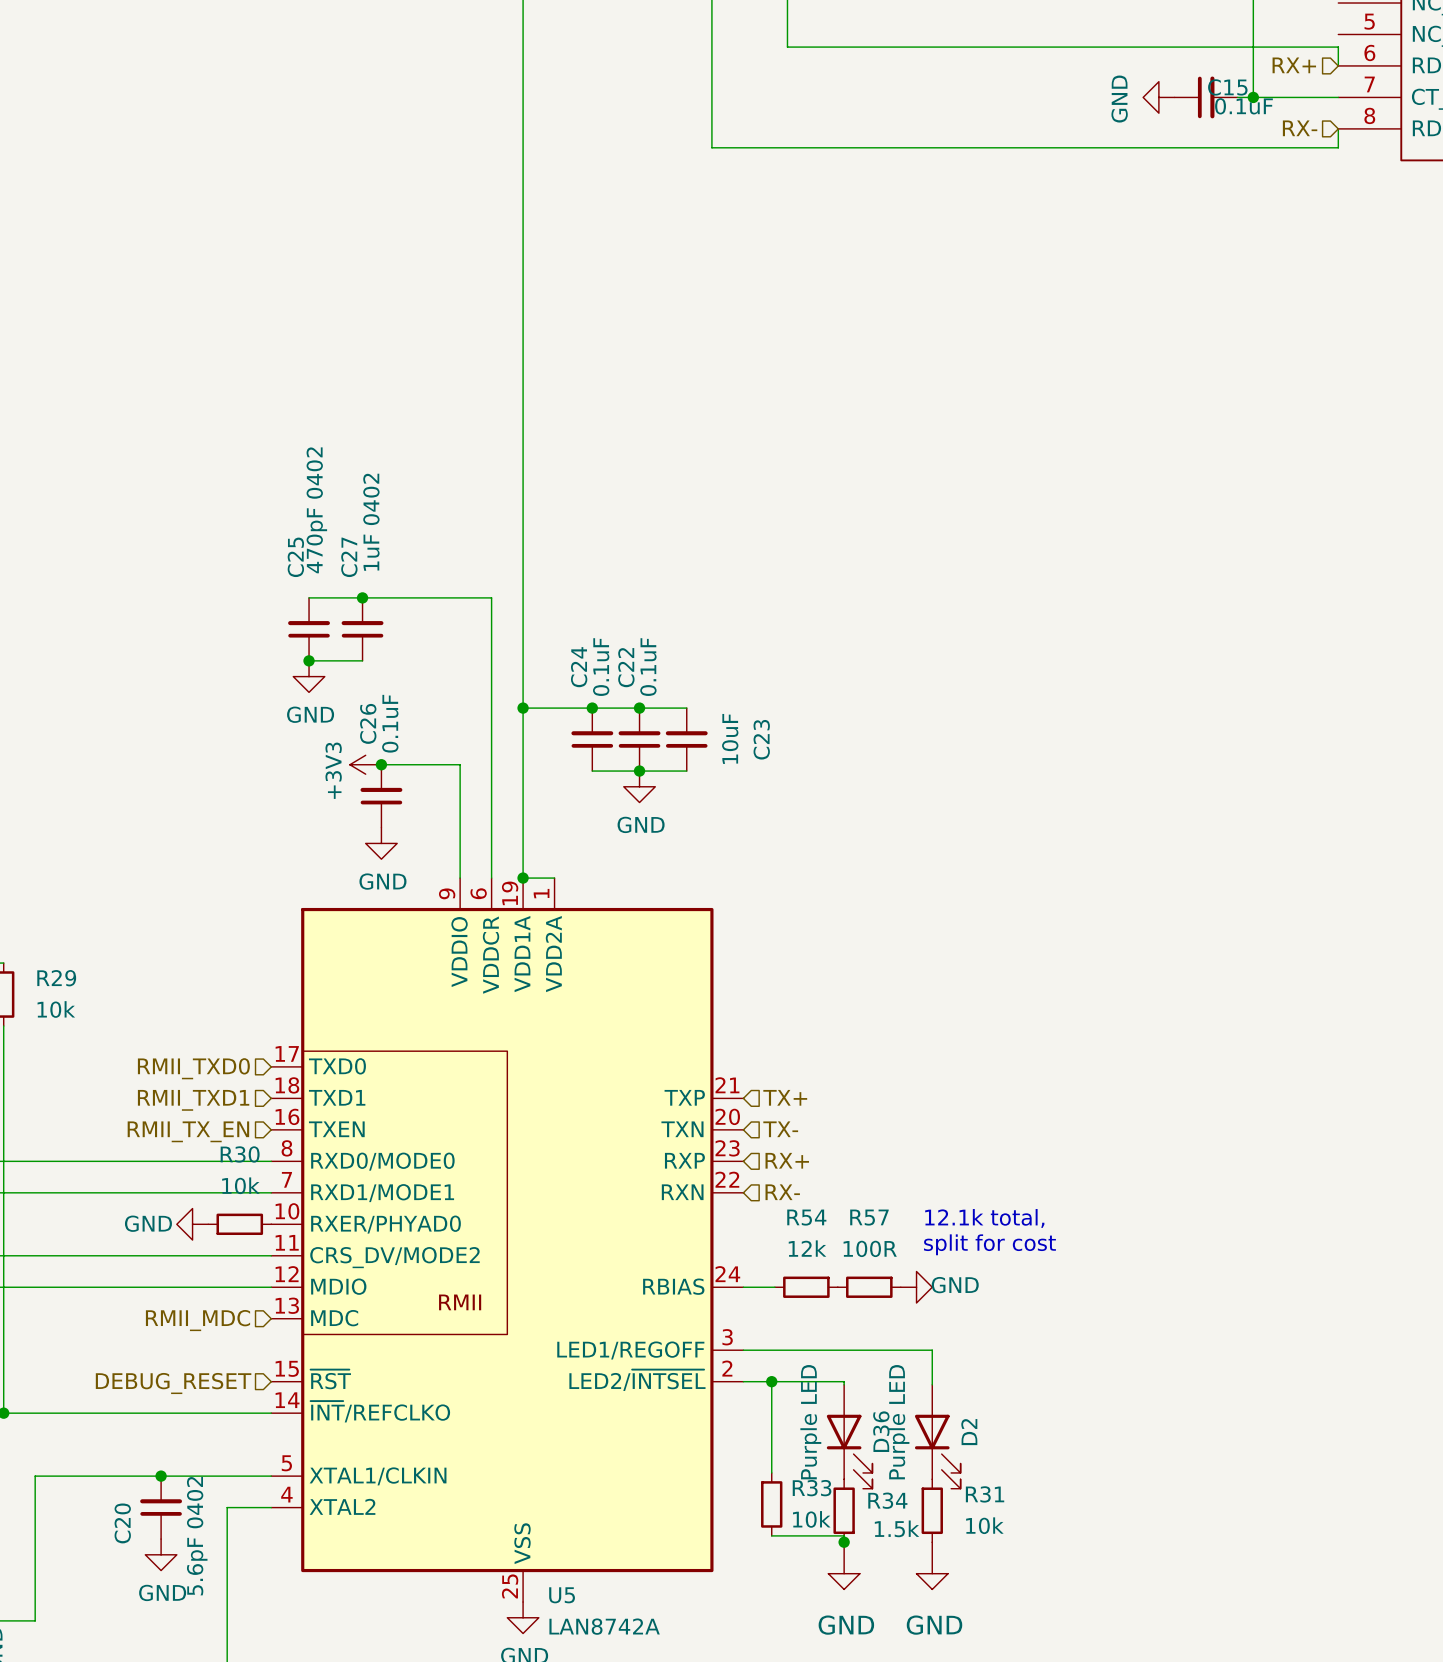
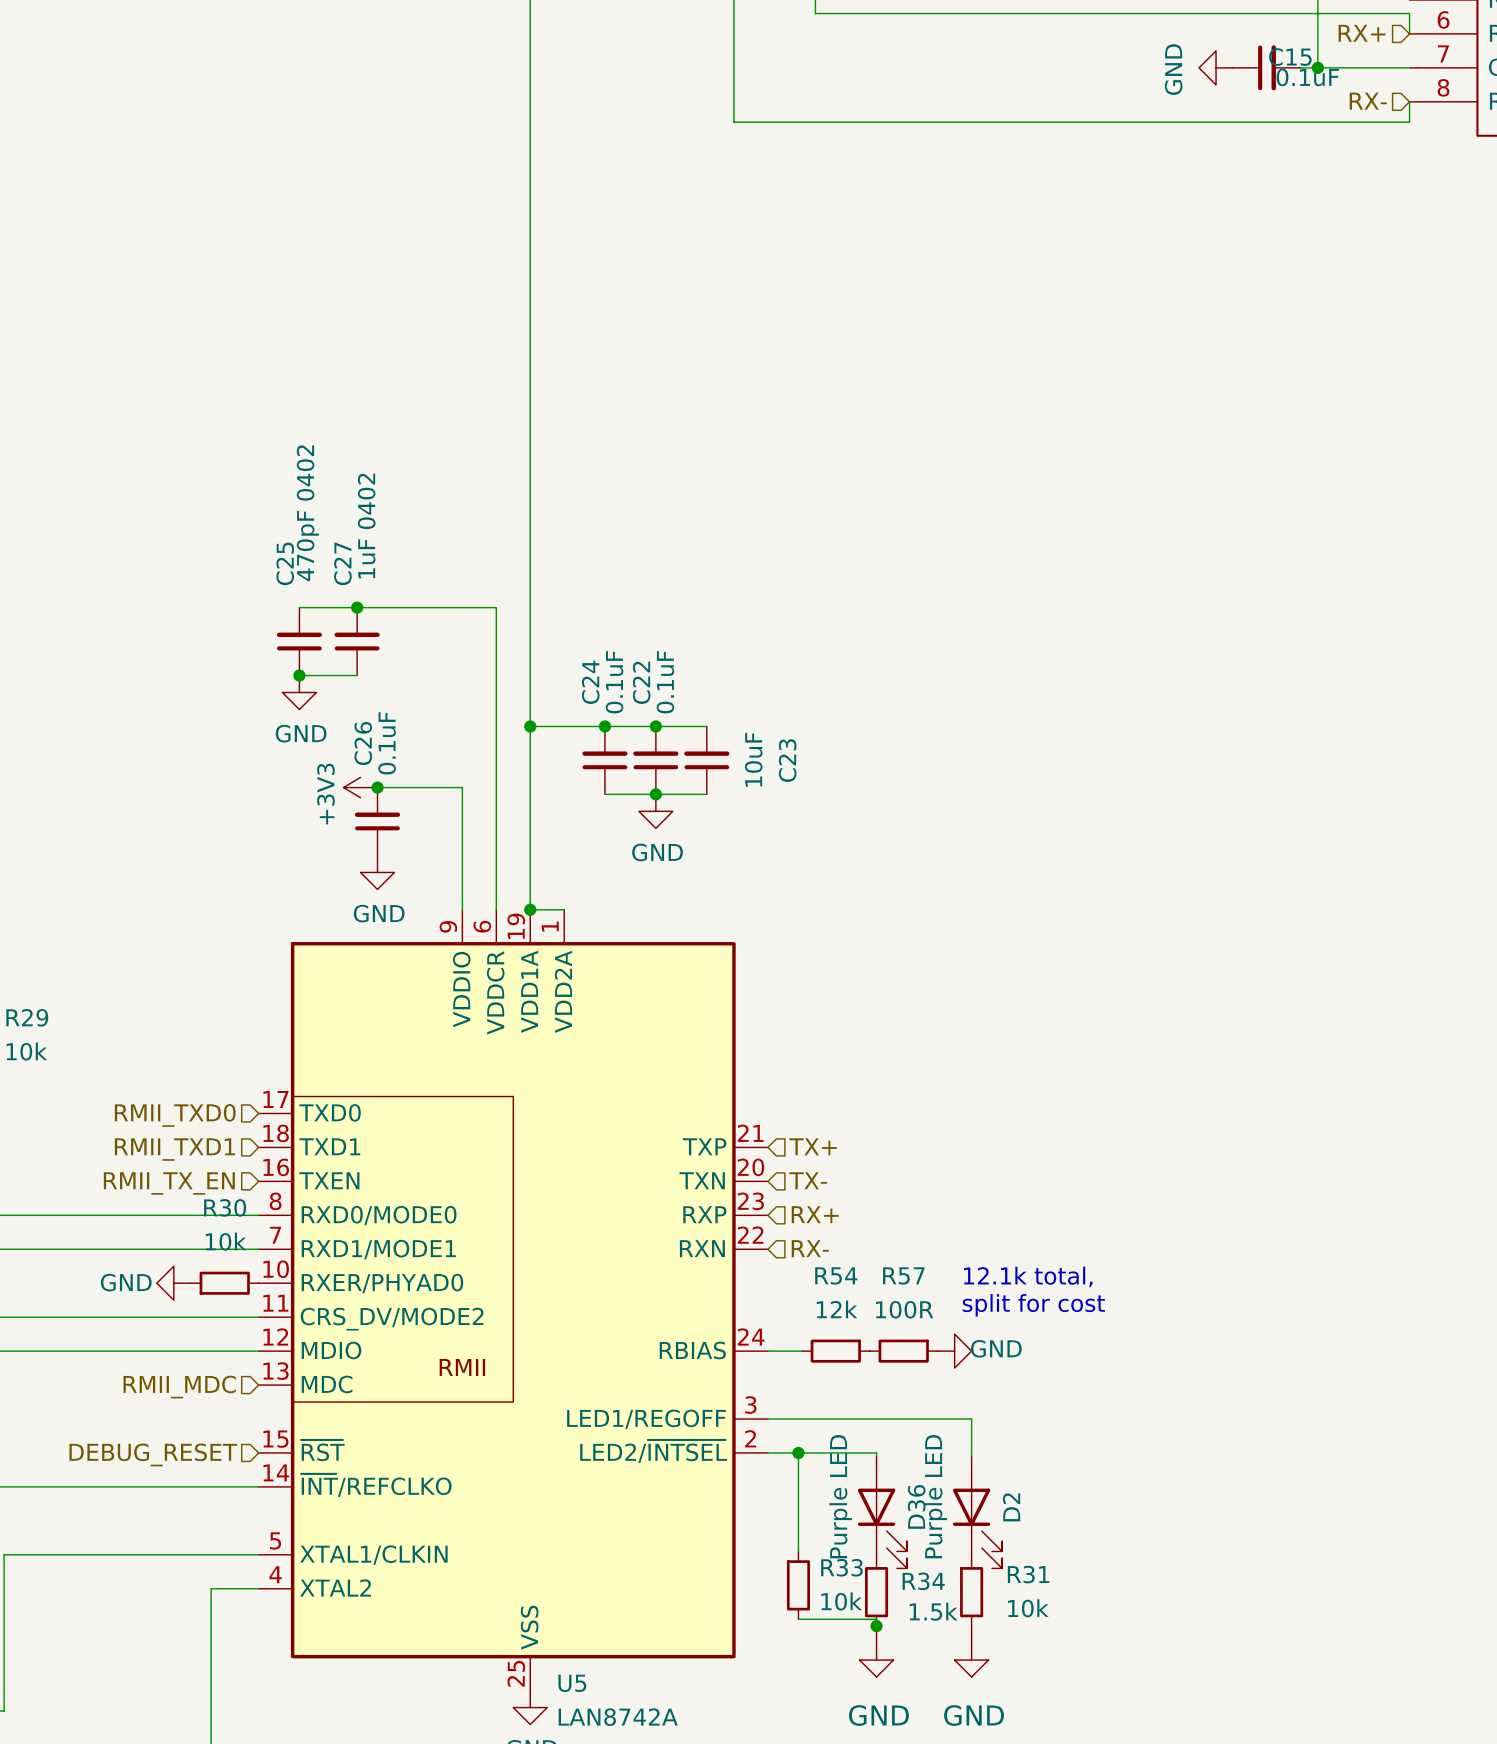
junction: (161, 1476) -> none
C20: 5.6pF 0402 (161, 1507) -> none
power symbol: GND (161, 1554) -> none

